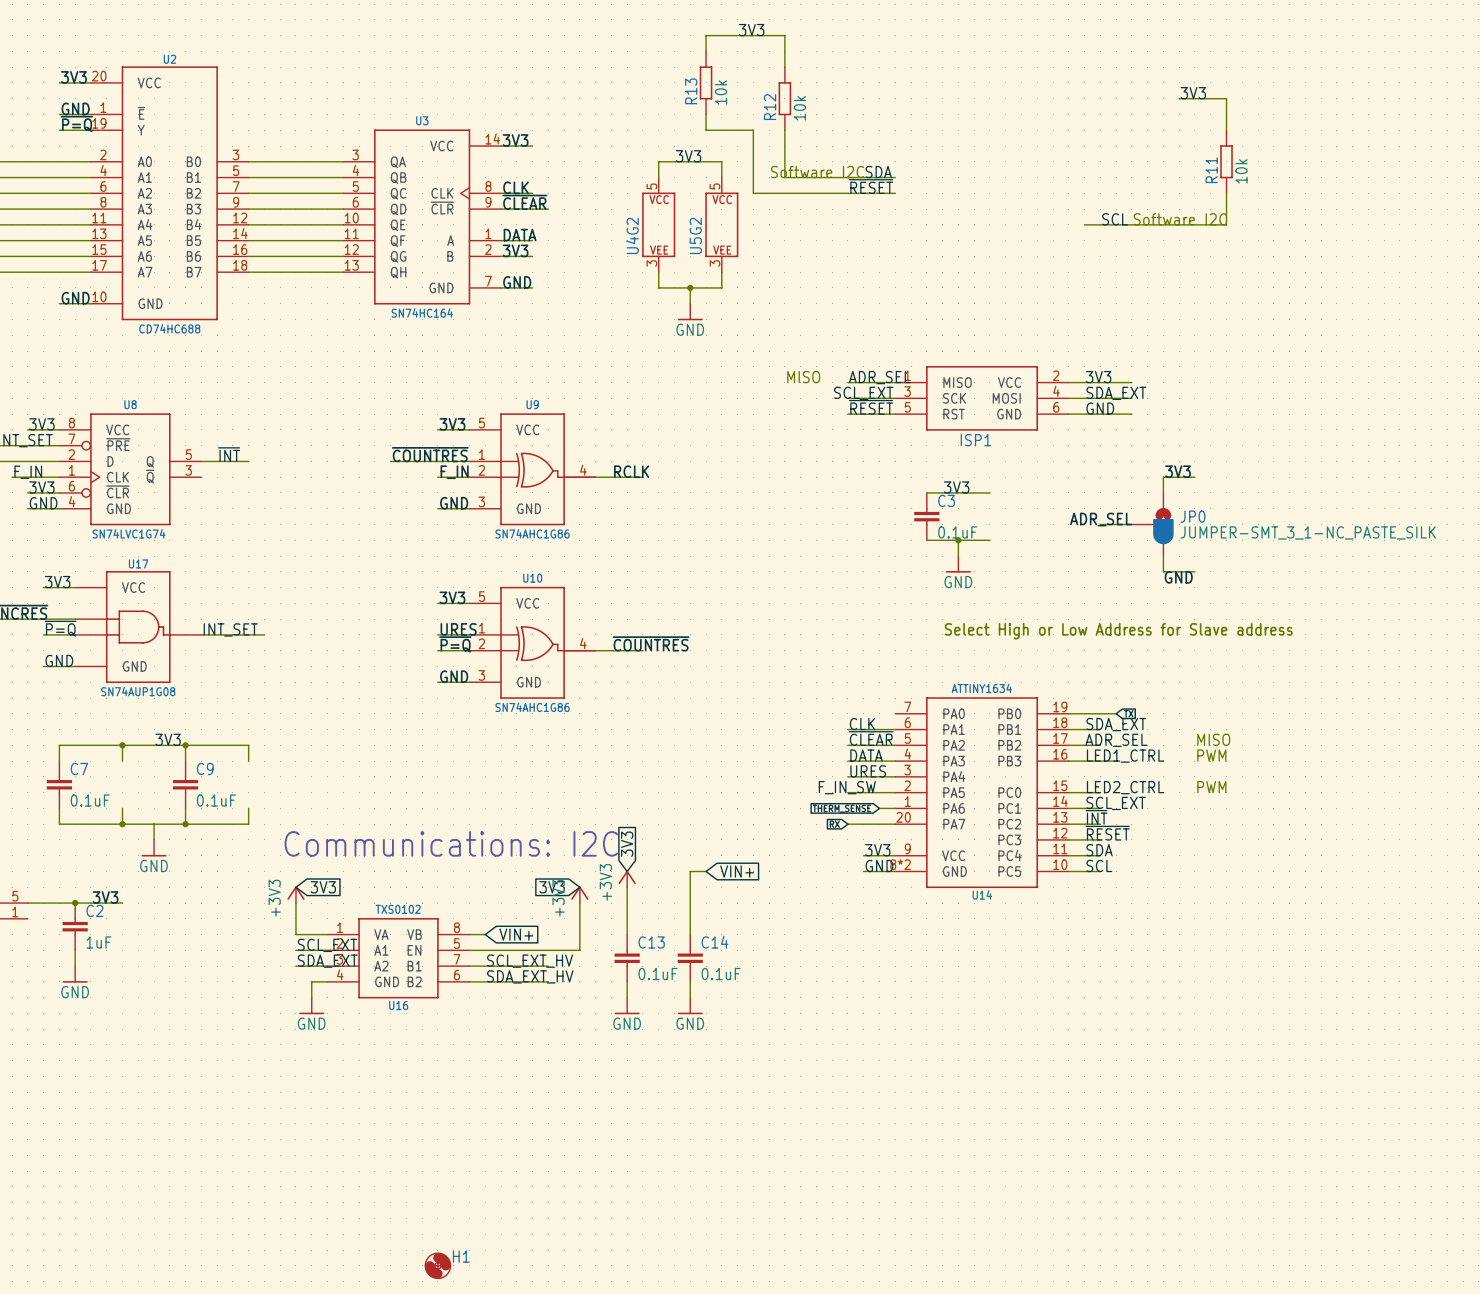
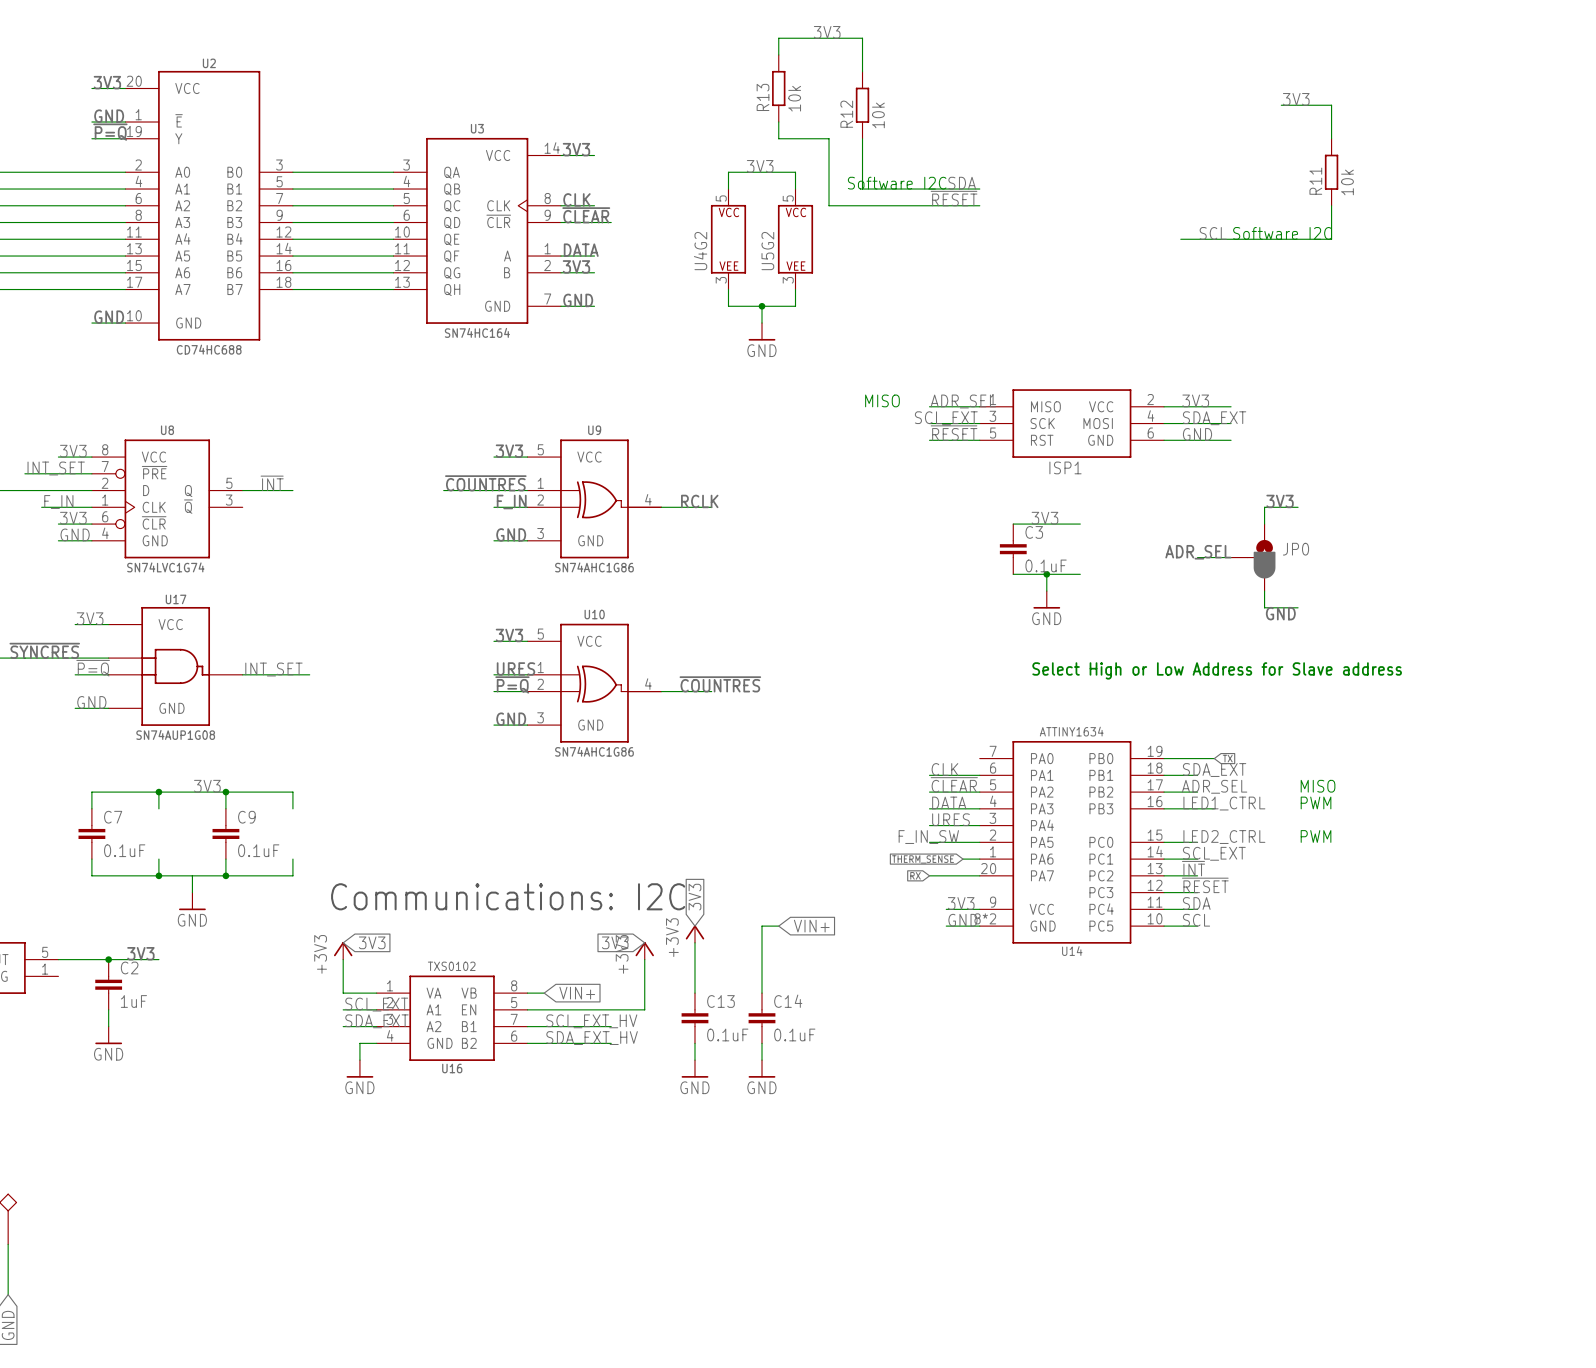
JP0 value: JUMPER-SMT_3_1-NC_PASTE_SILK (1308, 532) -> none
H1: (437, 1265) -> none

